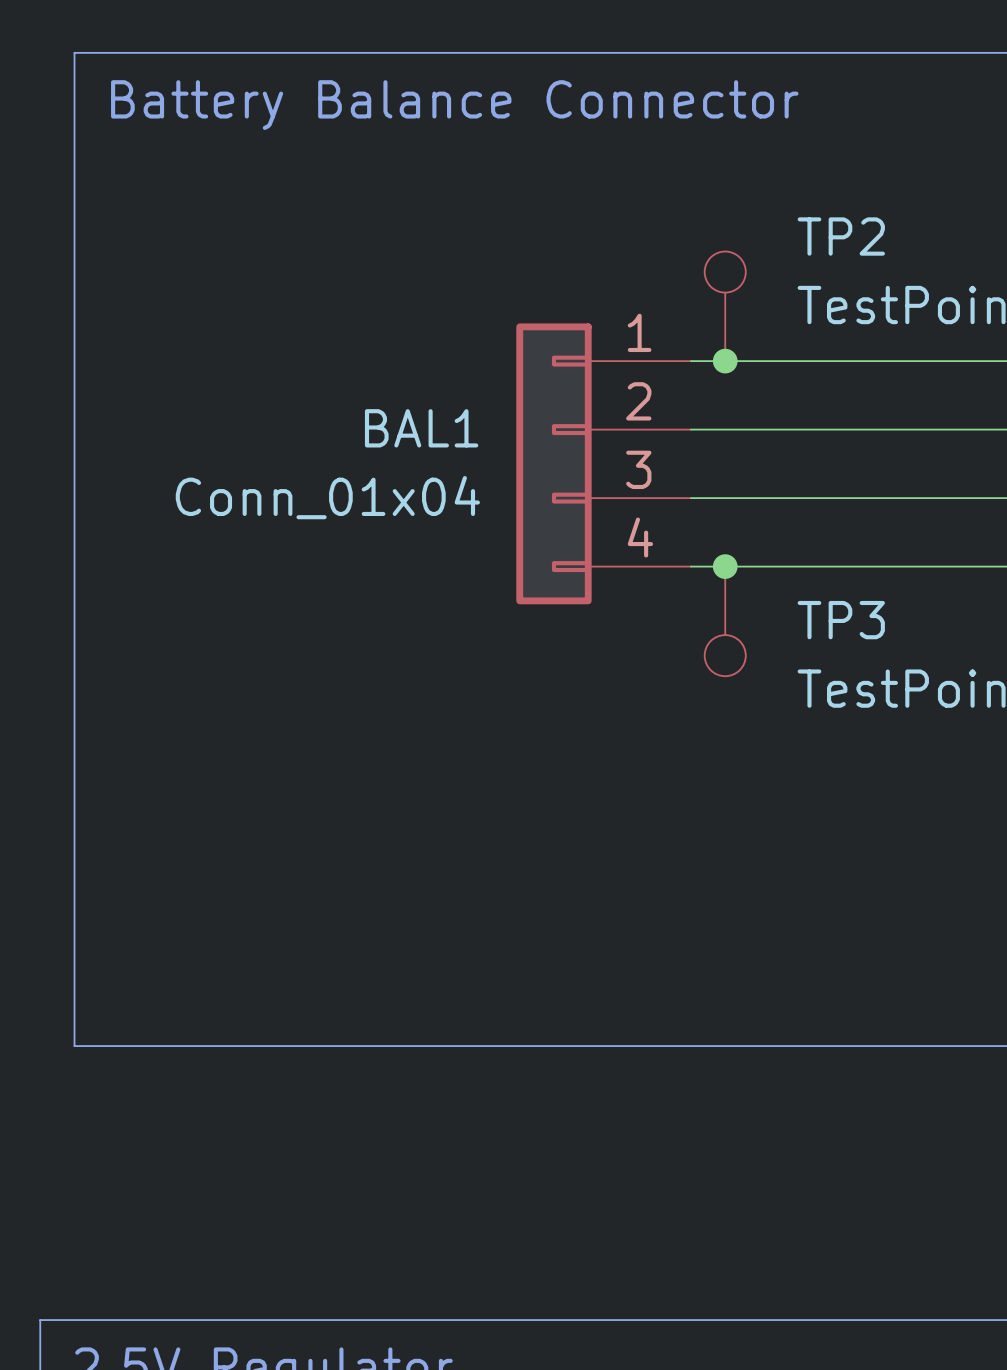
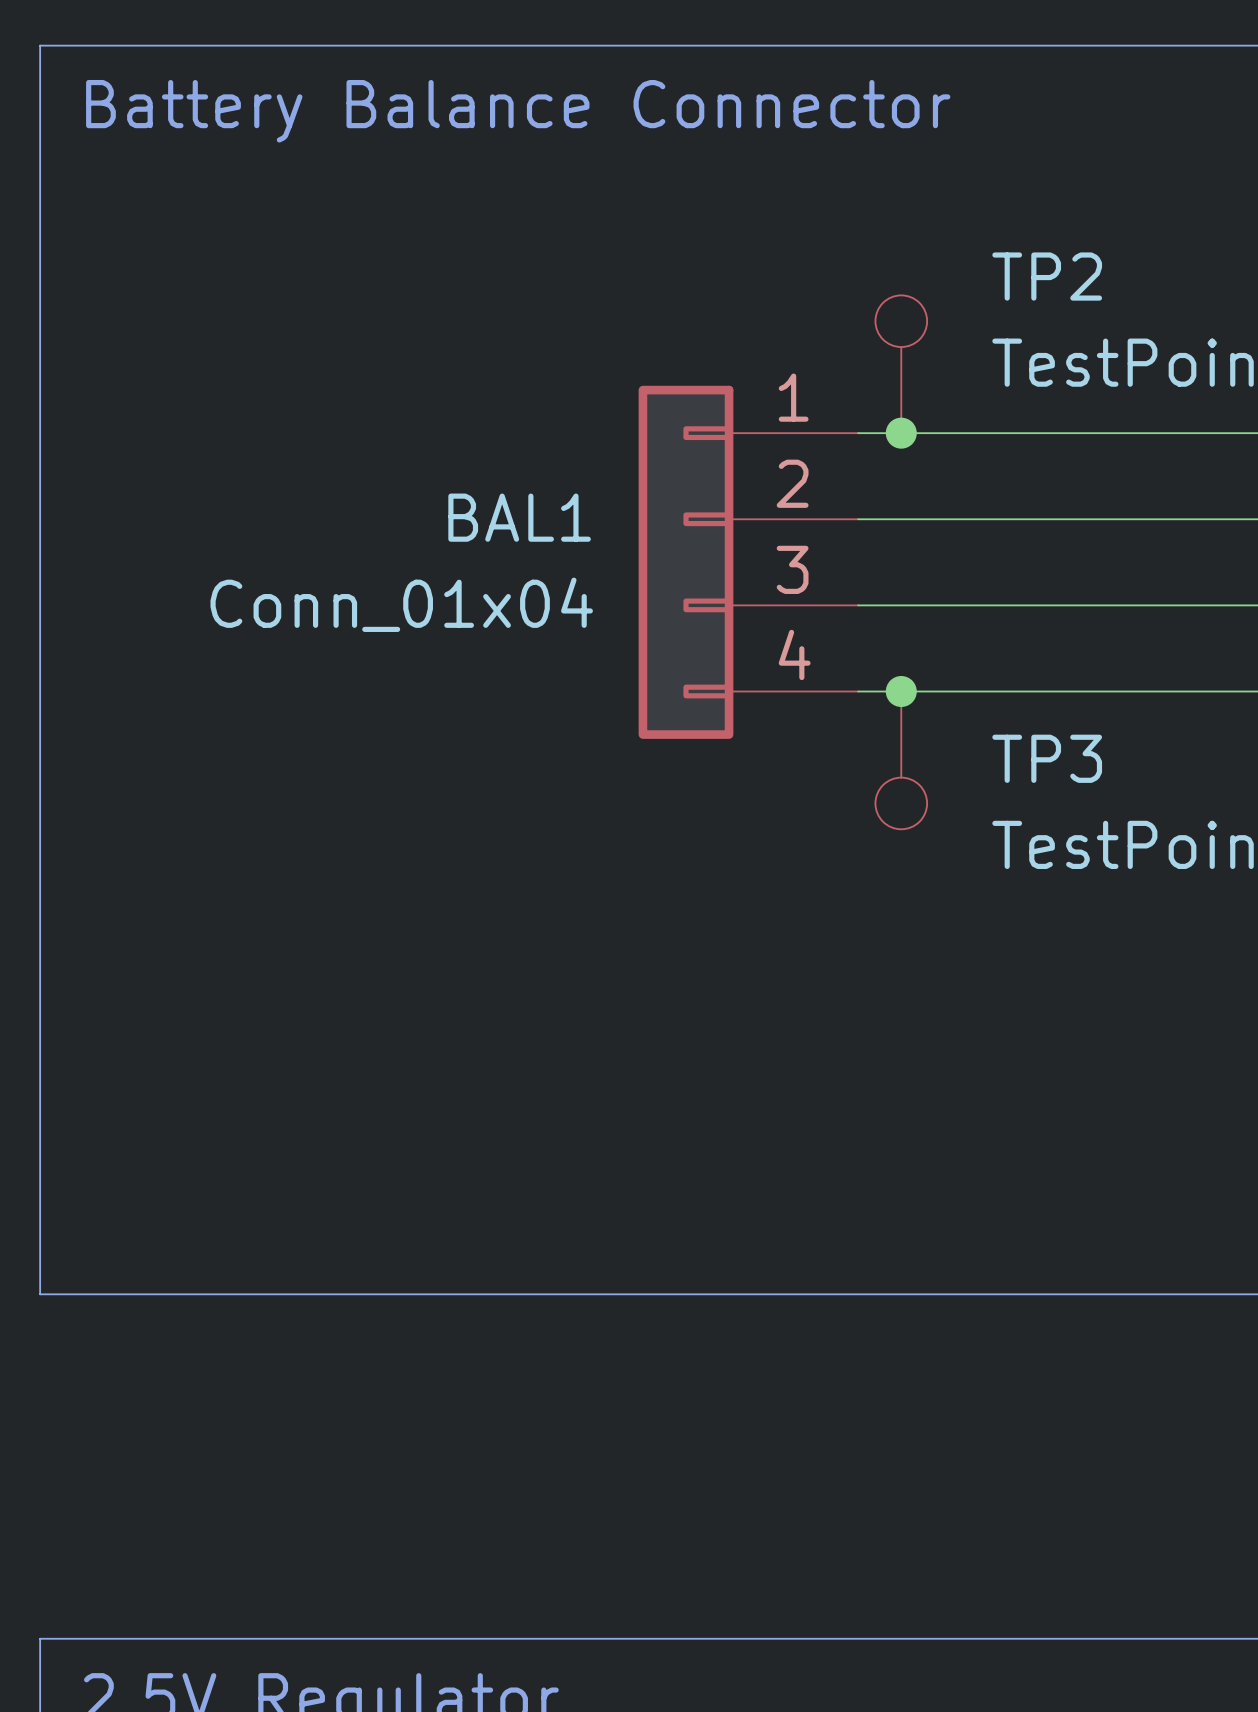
line: (74, 52) (74, 1046) -> (83, 45) (40, 45) (40, 1294) (83, 1294)
text position: Battery Balance Connector (454, 105) -> Battery Balance Connector (518, 111)

